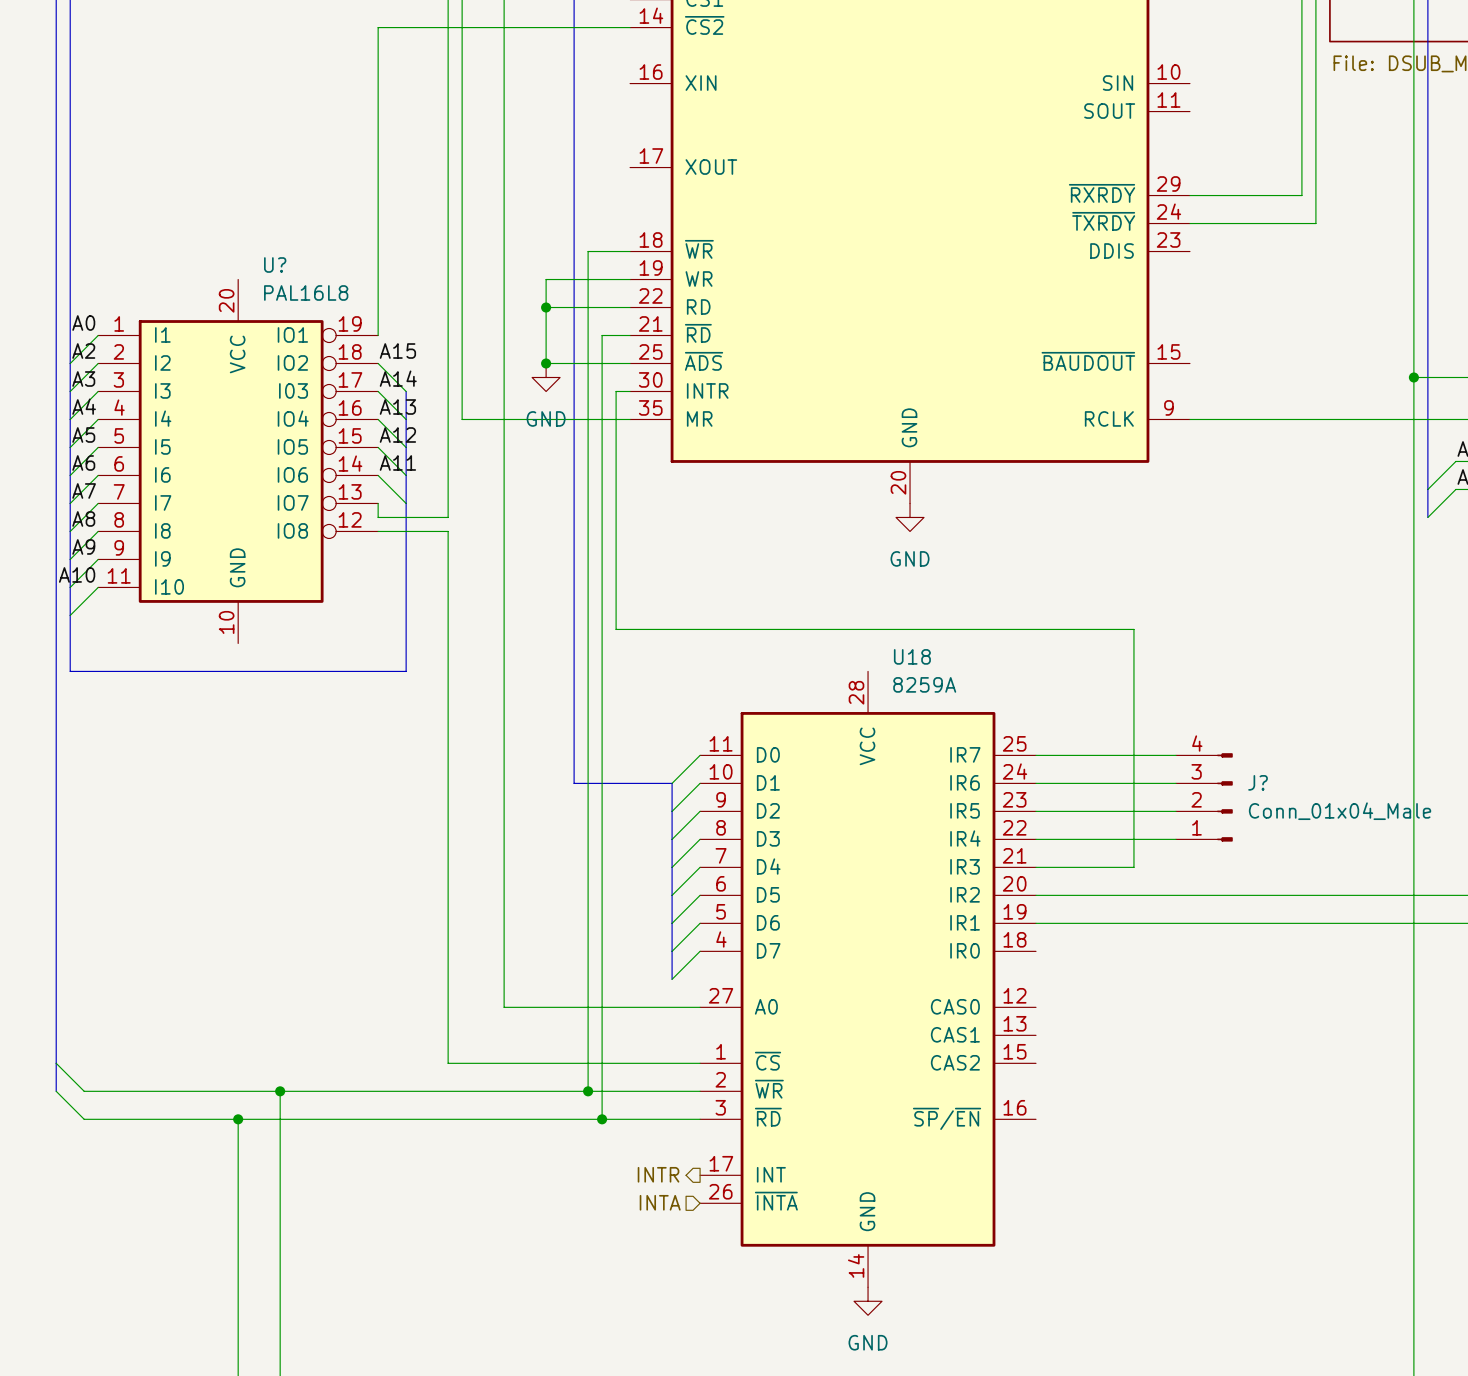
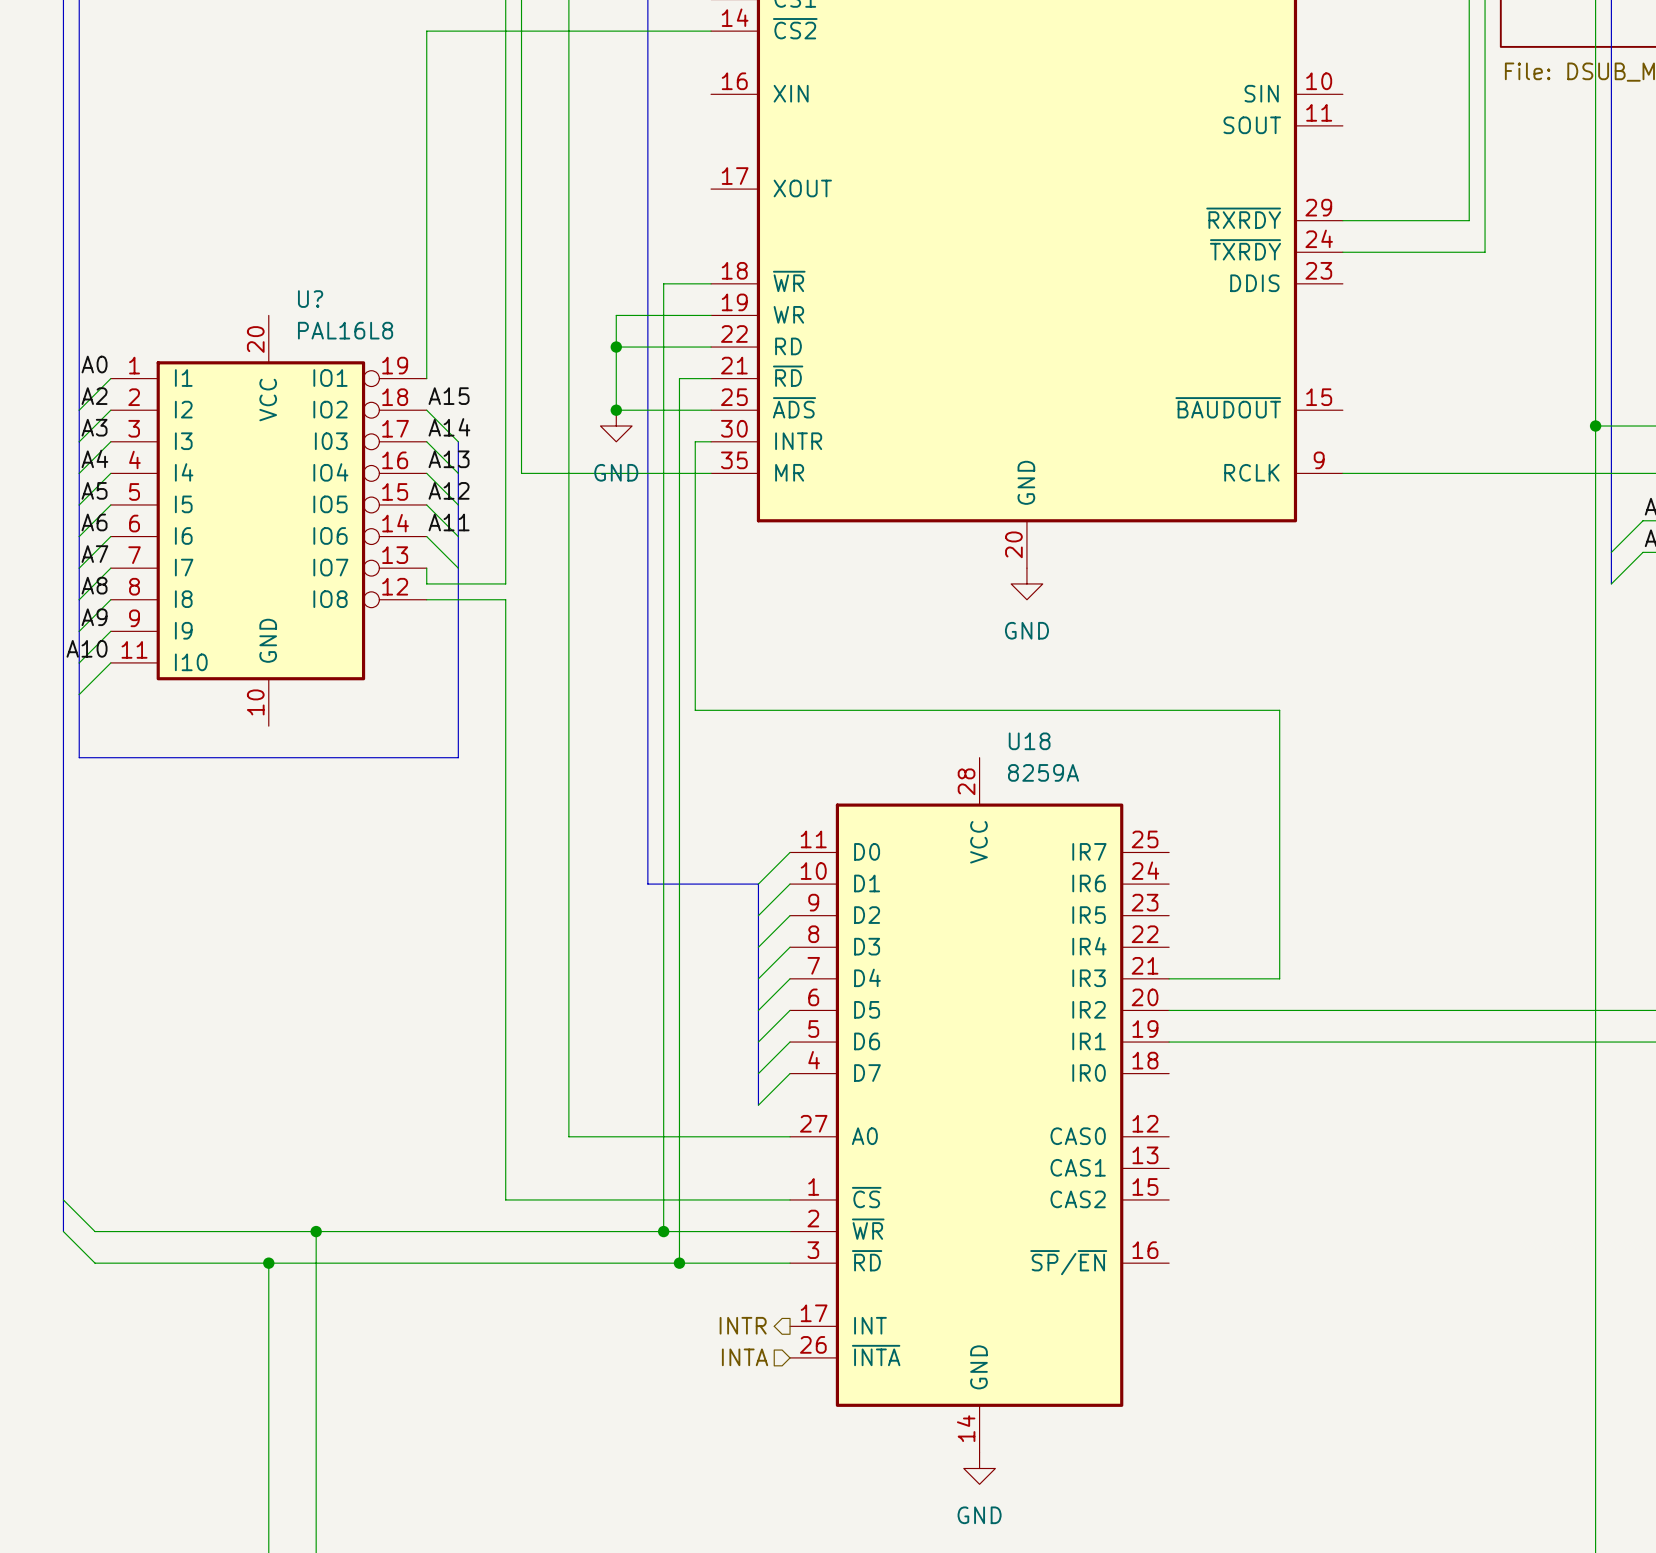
wire: (1035, 755) (1175, 755) -> none
wire: (1035, 783) (1175, 783) -> none
J?: Conn_01x04_Male (1204, 797) -> none
wire: (1035, 811) (1175, 811) -> none
wire: (1035, 839) (1175, 839) -> none

